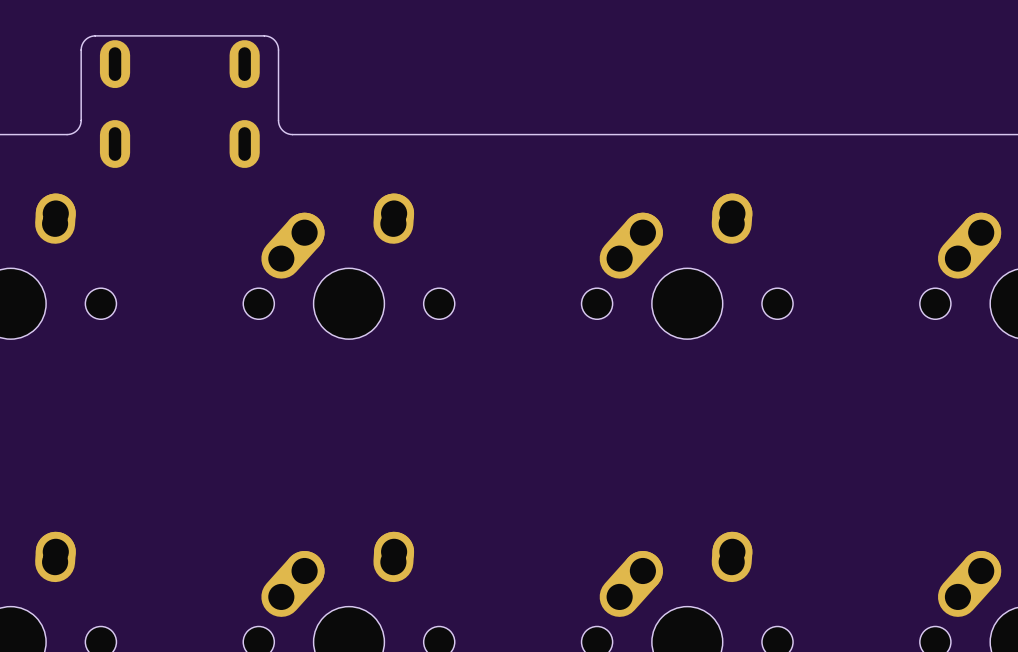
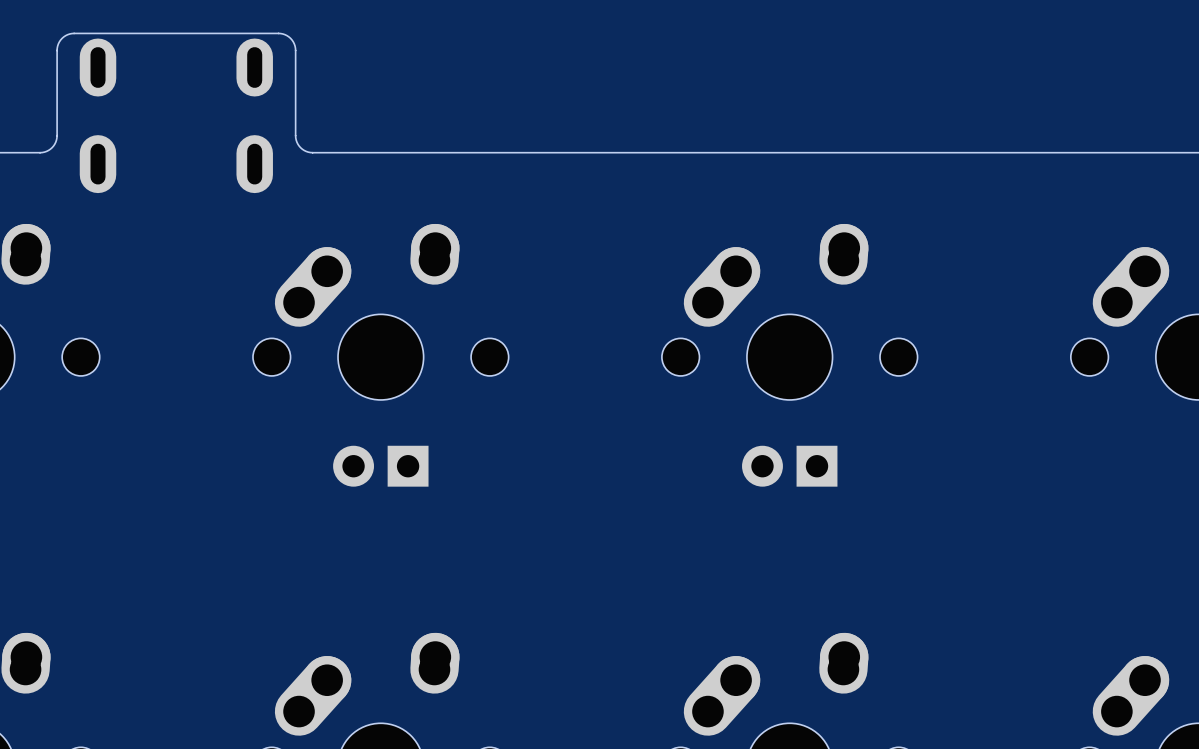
part: none -> (380, 355)
part: none -> (789, 355)

